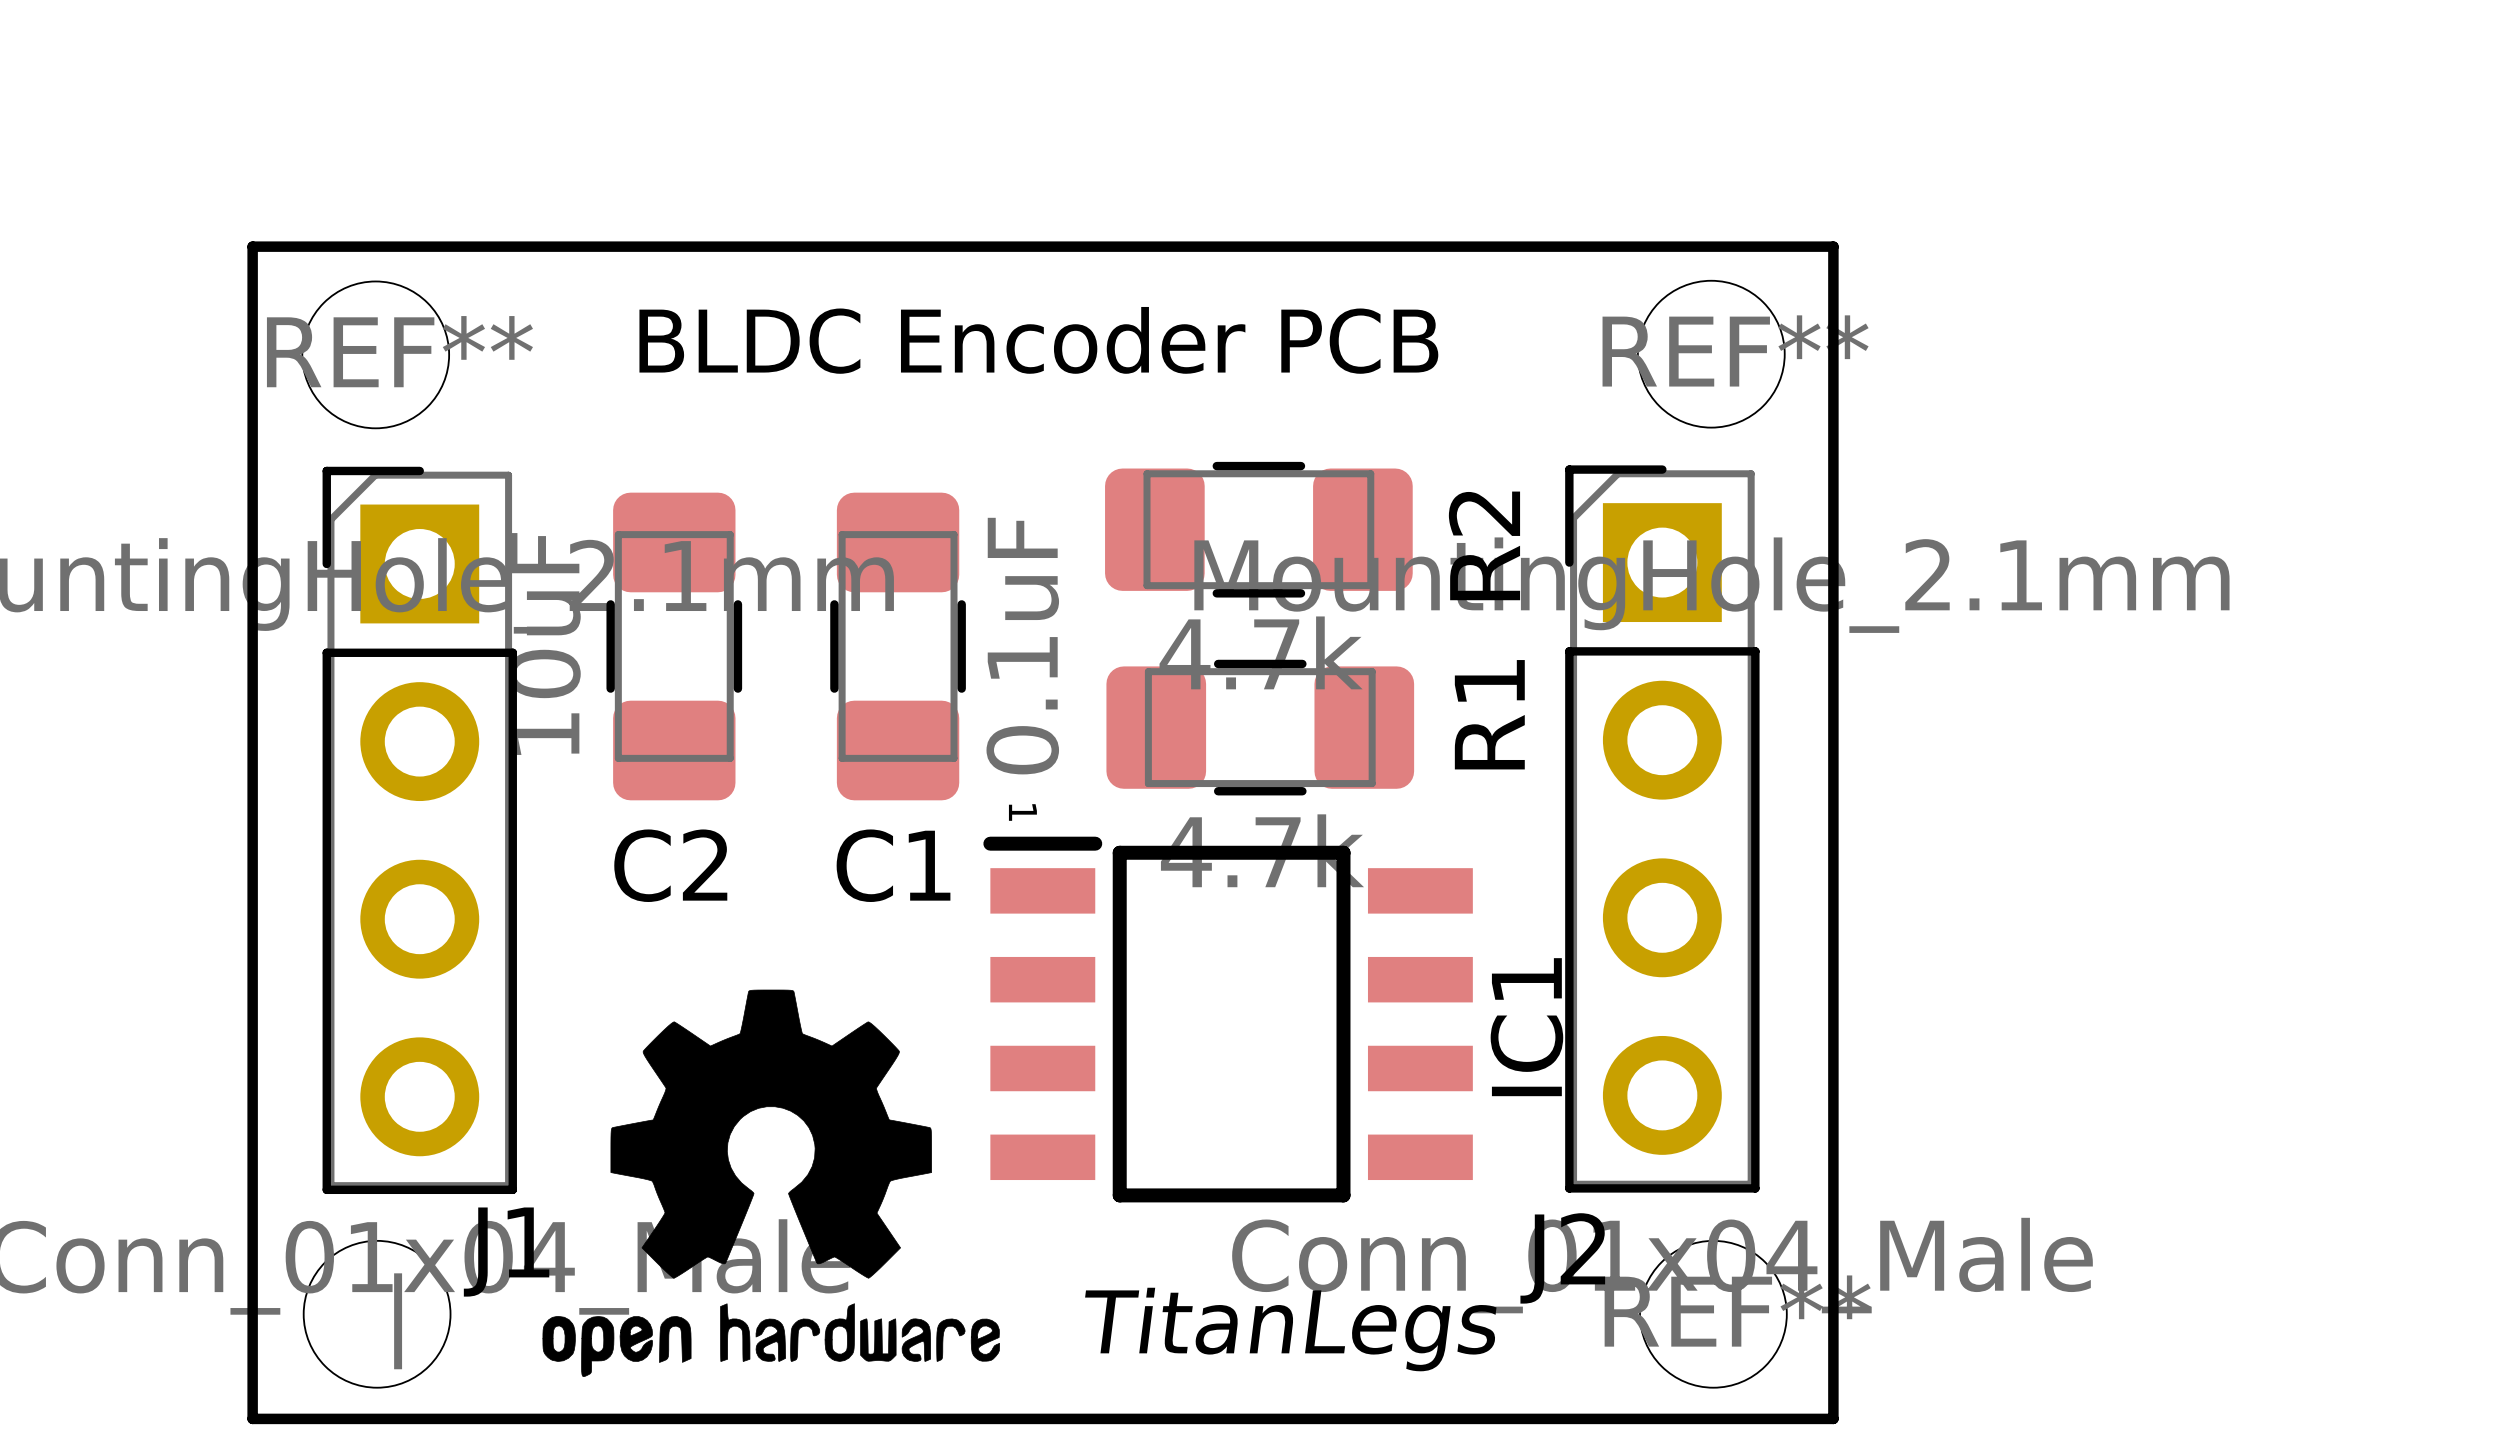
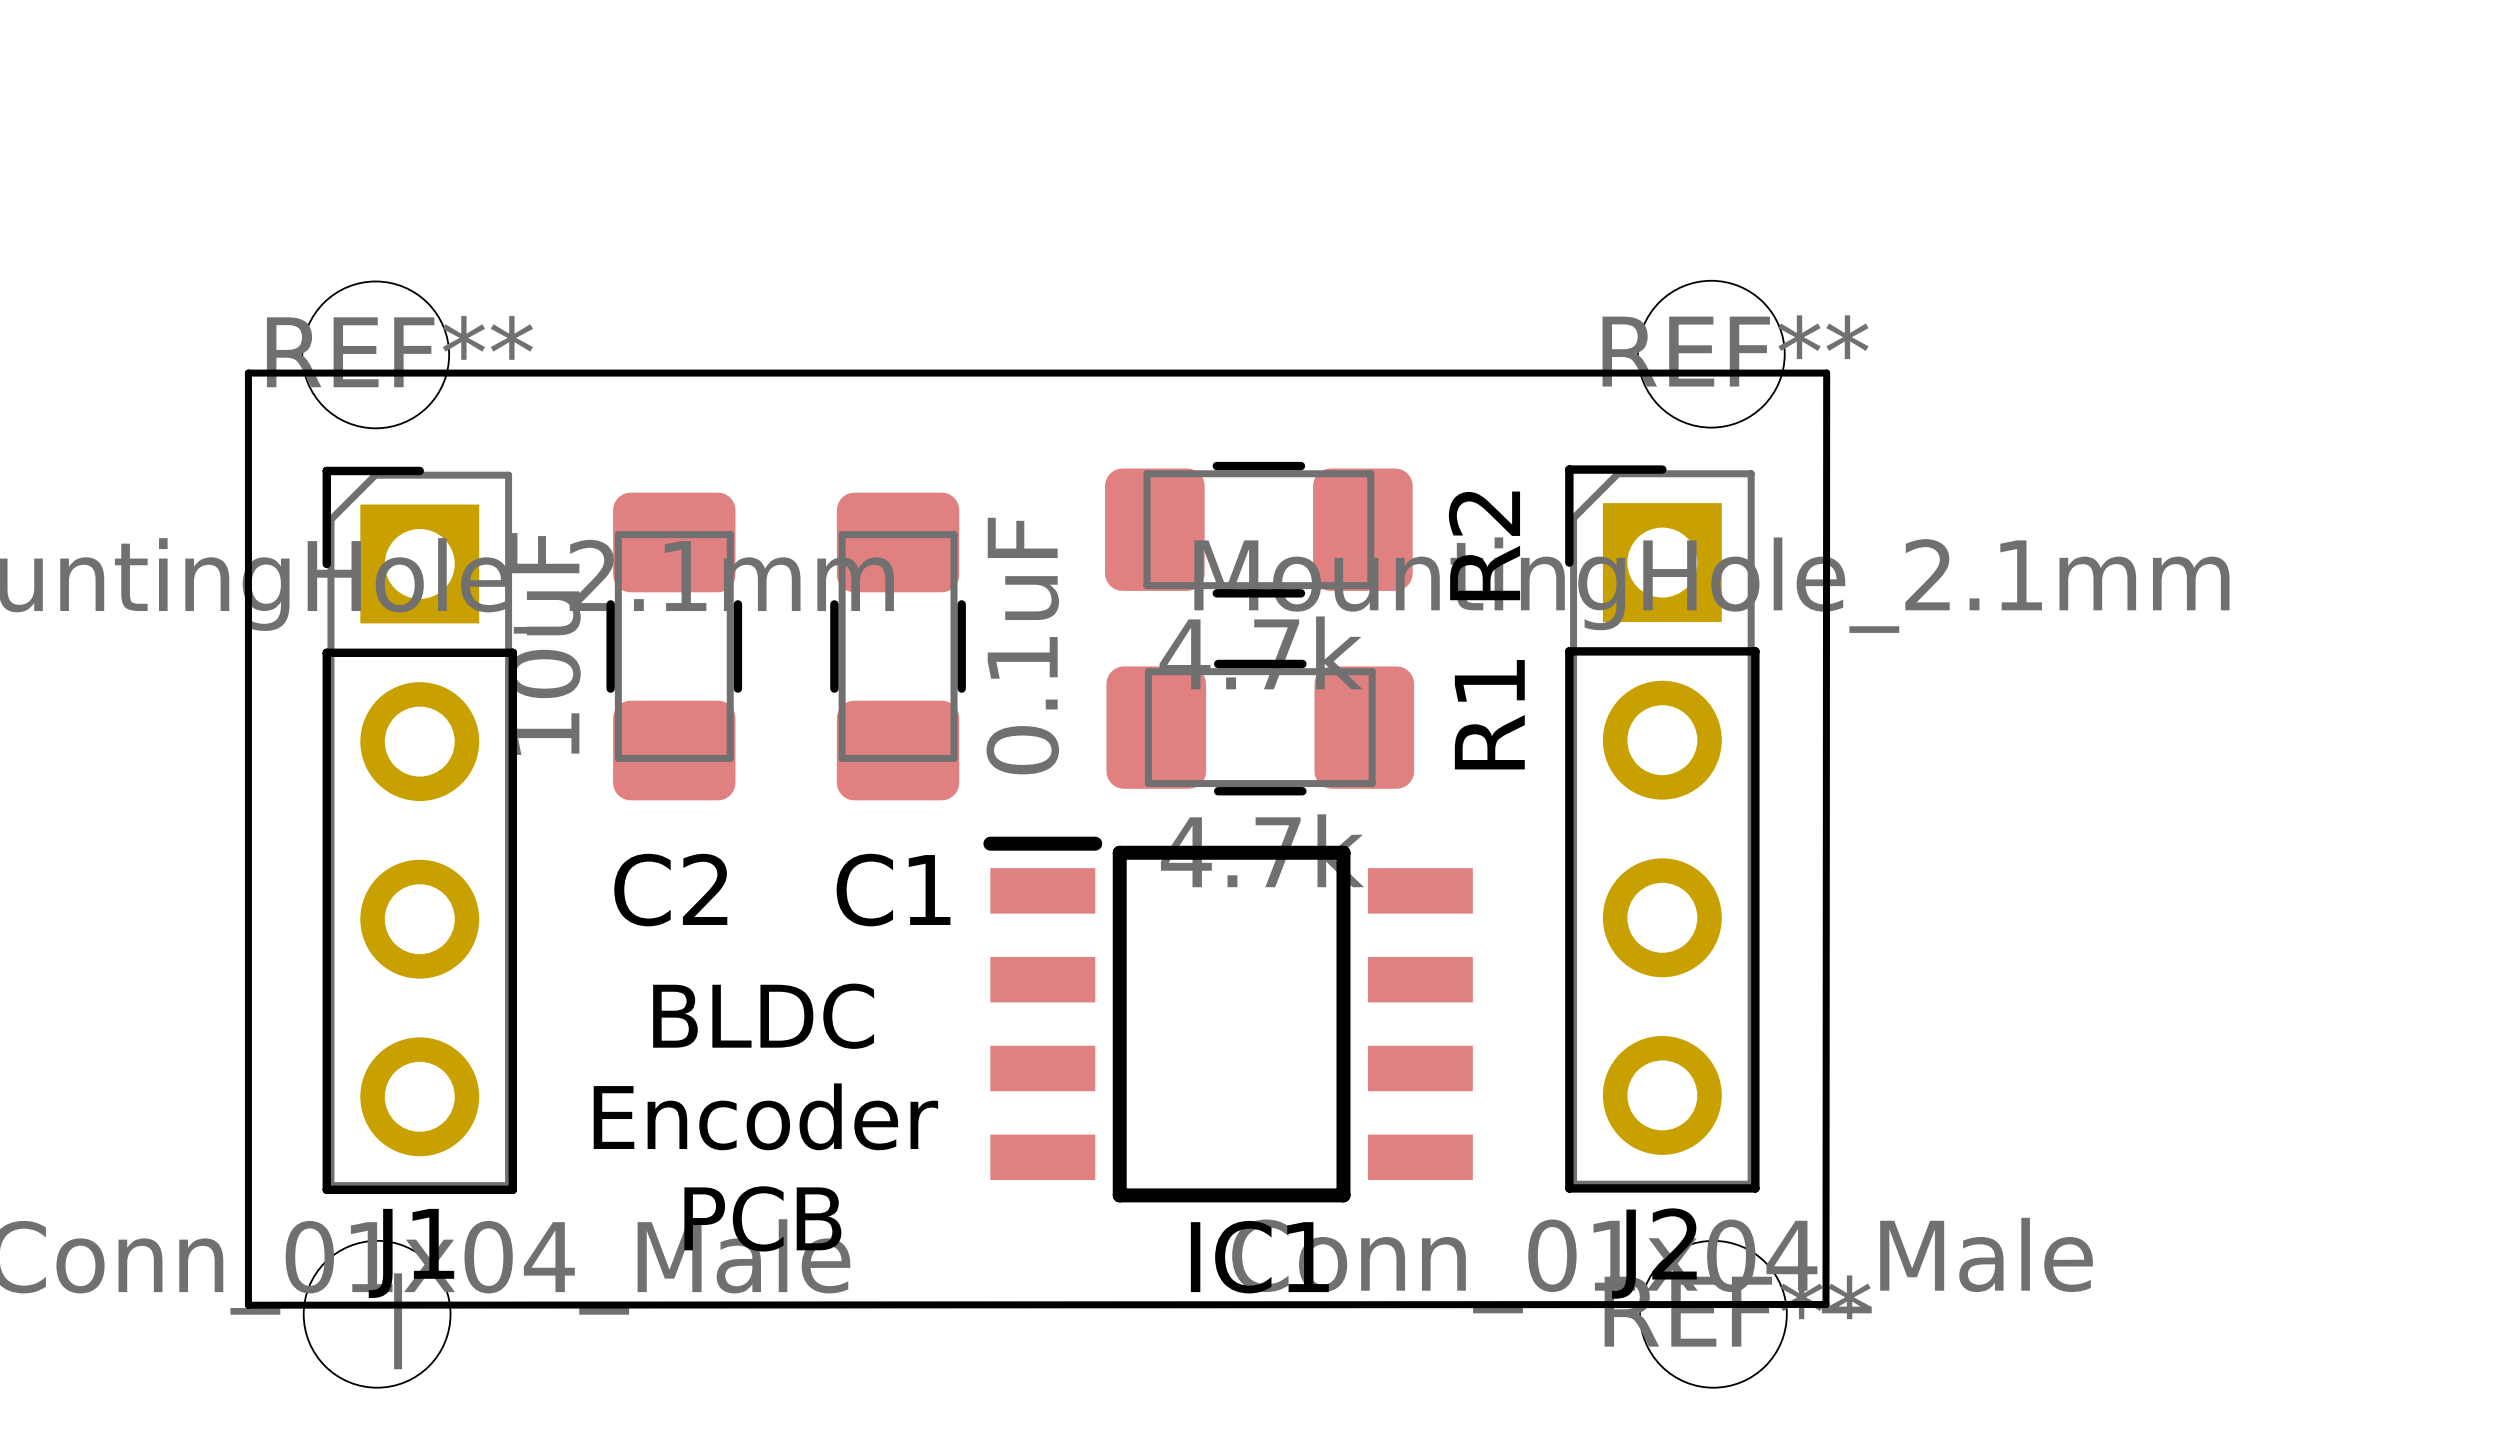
board edge: (252, 246) (252, 1418) (1833, 1418) (1833, 246) (252, 246) -> (248, 373) (248, 1305) (1825, 1304) (1826, 373) (248, 373)
text: BLDC Encoder PCB (1038, 340) -> none
text: 1 (1022, 812) -> none
C2 name position: C2 (670, 865) -> C2 (670, 890)
C1 name position: C1 (893, 865) -> C1 (893, 890)
drawing: [542, 989, 1000, 1377] -> none
text: none -> BLDC (763, 1016)
IC1 name rotation: 0° (1526, 1027) -> 90° clockwise (1259, 1257)
IC1 name position: IC1 (1526, 1027) -> IC1 (1259, 1257)
text: none -> Encoder (765, 1116)
text: none -> PCB (762, 1218)
J1 name position: J1 (506, 1252) -> J1 (411, 1253)
J2 name position: J2 (1562, 1258) -> J2 (1654, 1253)
text: TitanLegs (1290, 1329) -> none

